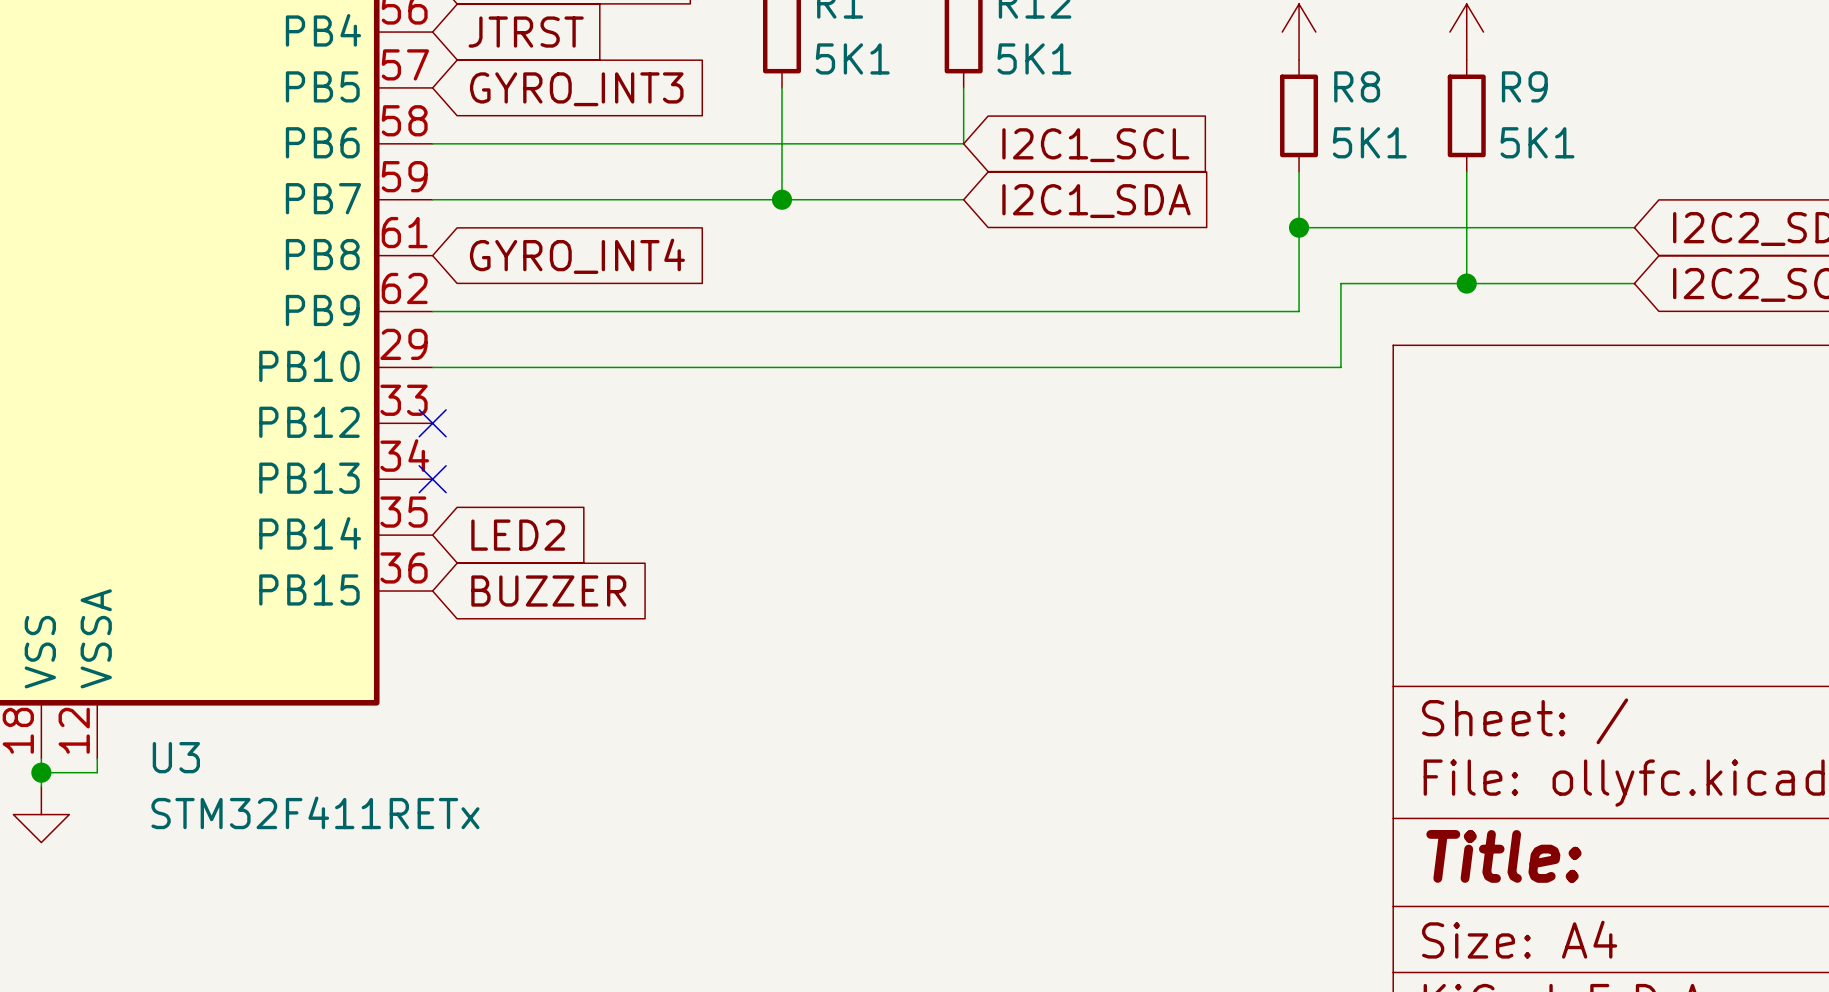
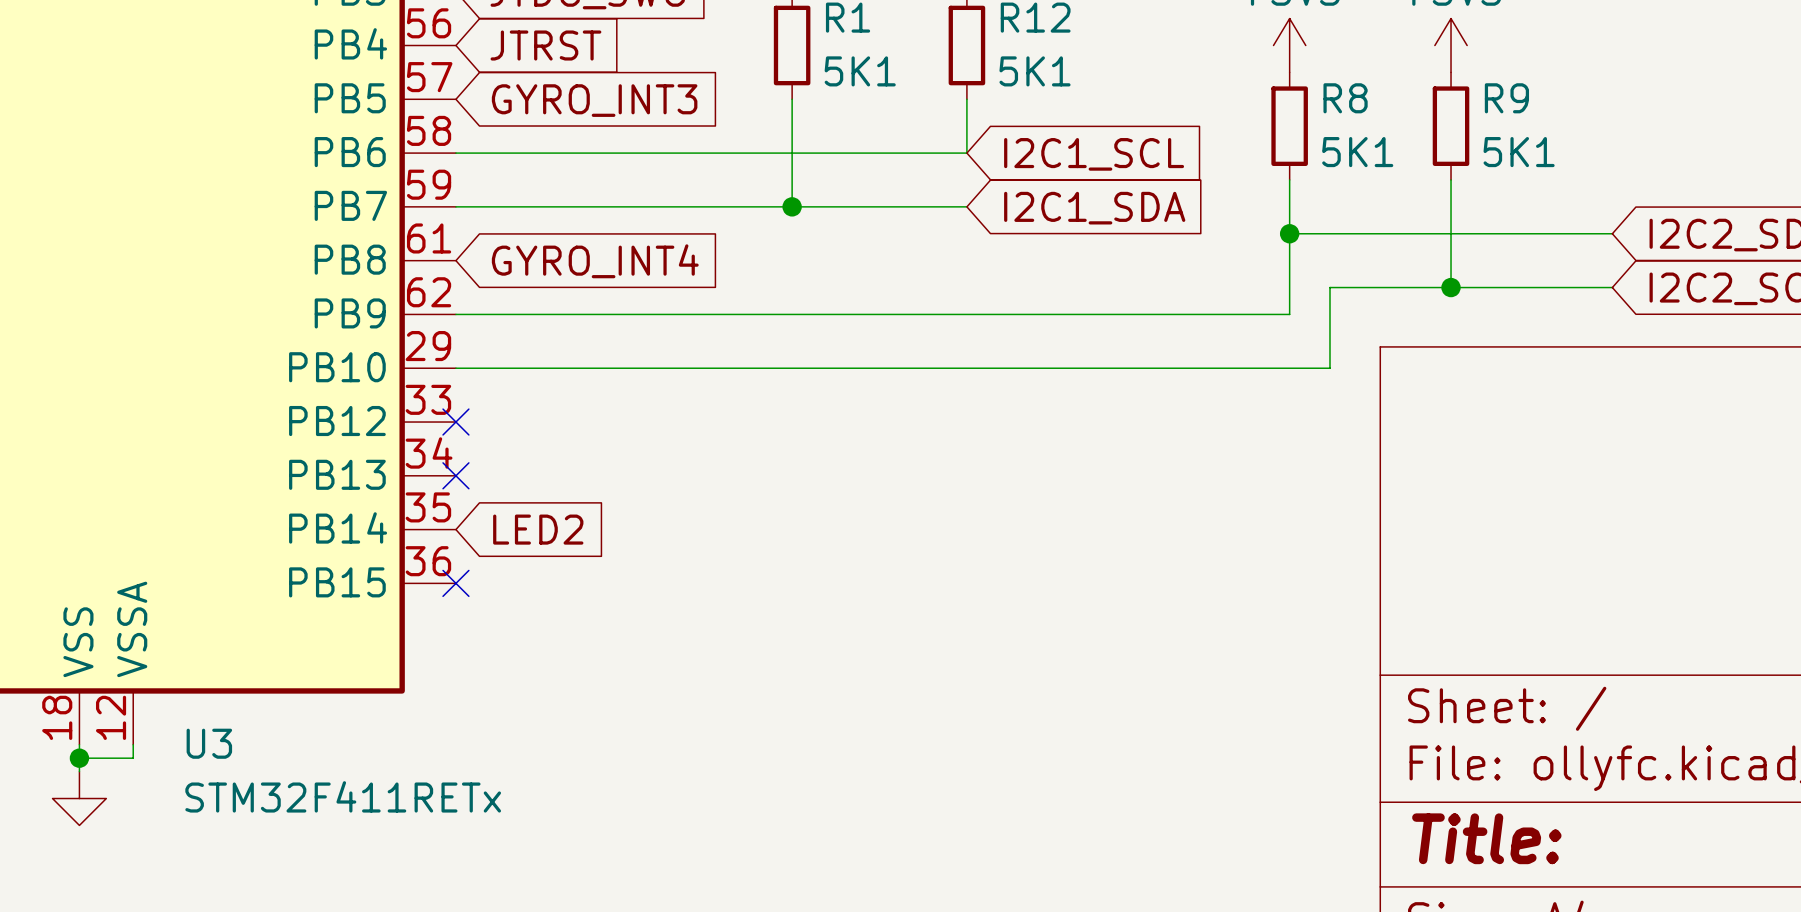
no-connect mark: none -> (455, 583)
global label: BUZZER (548, 591) -> none

